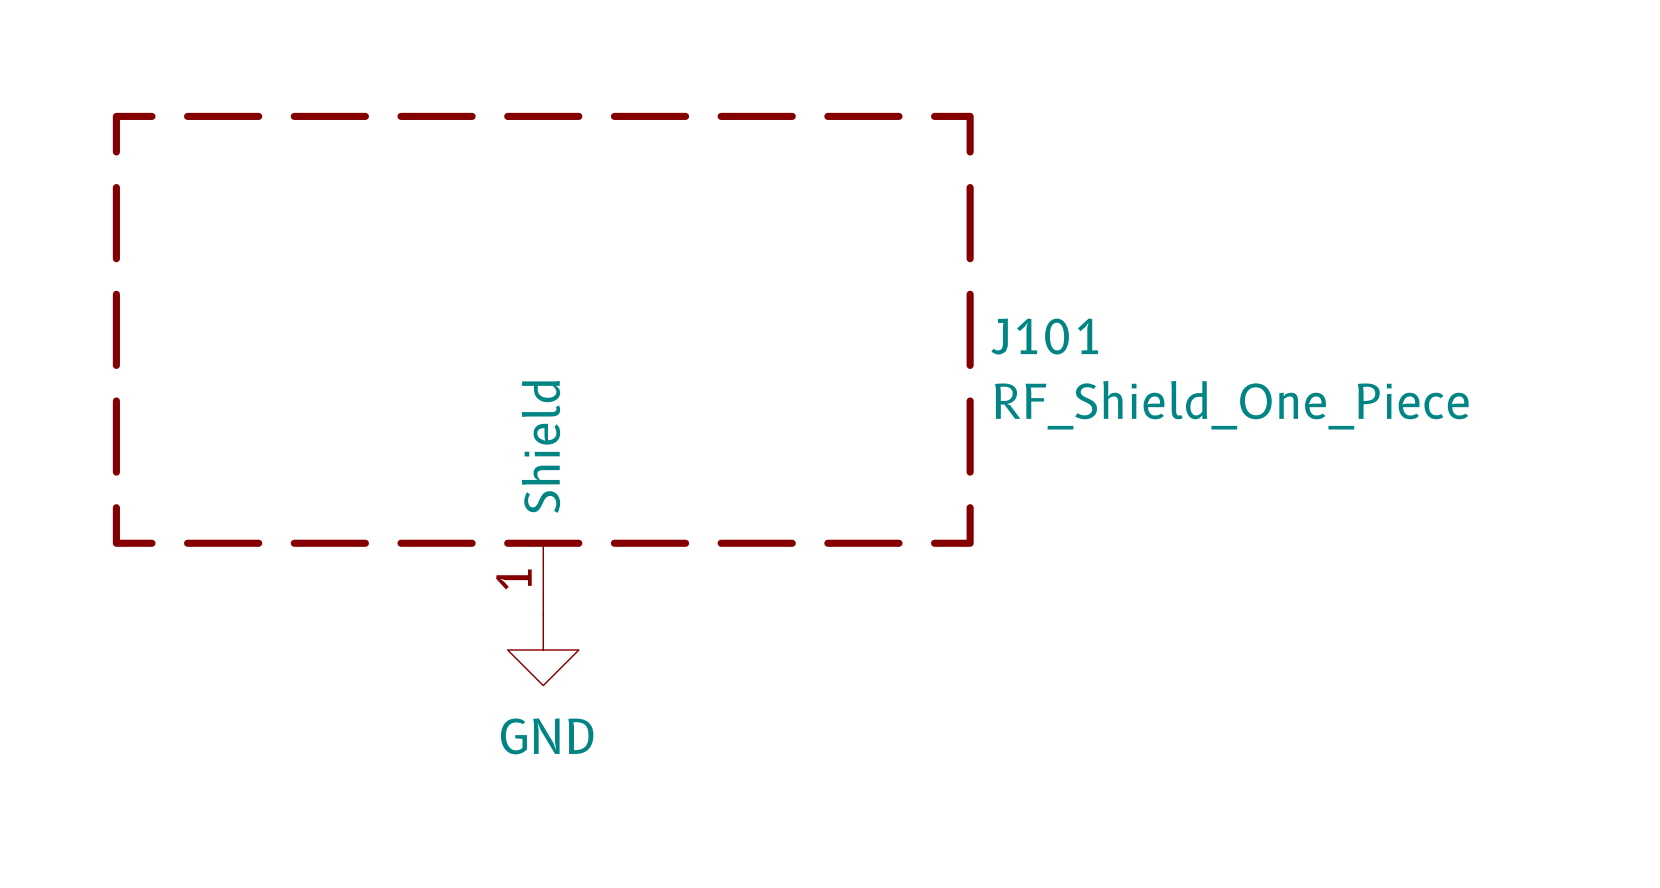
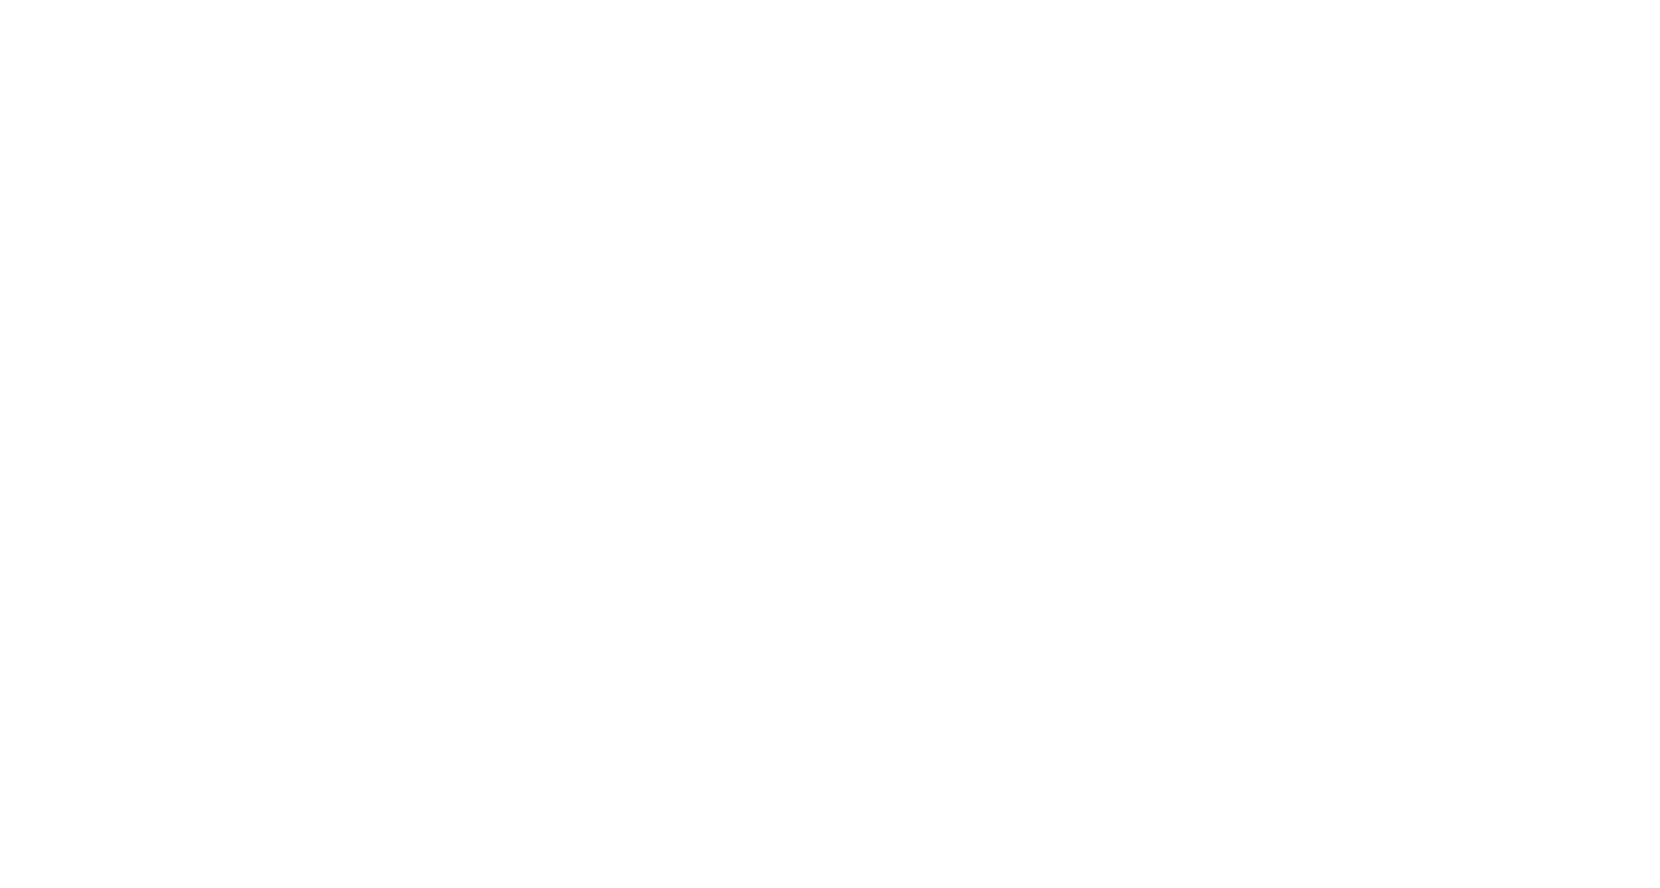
J101: RF_Shield_One_Piece (543, 363) -> none
power symbol: GND (543, 649) -> none

